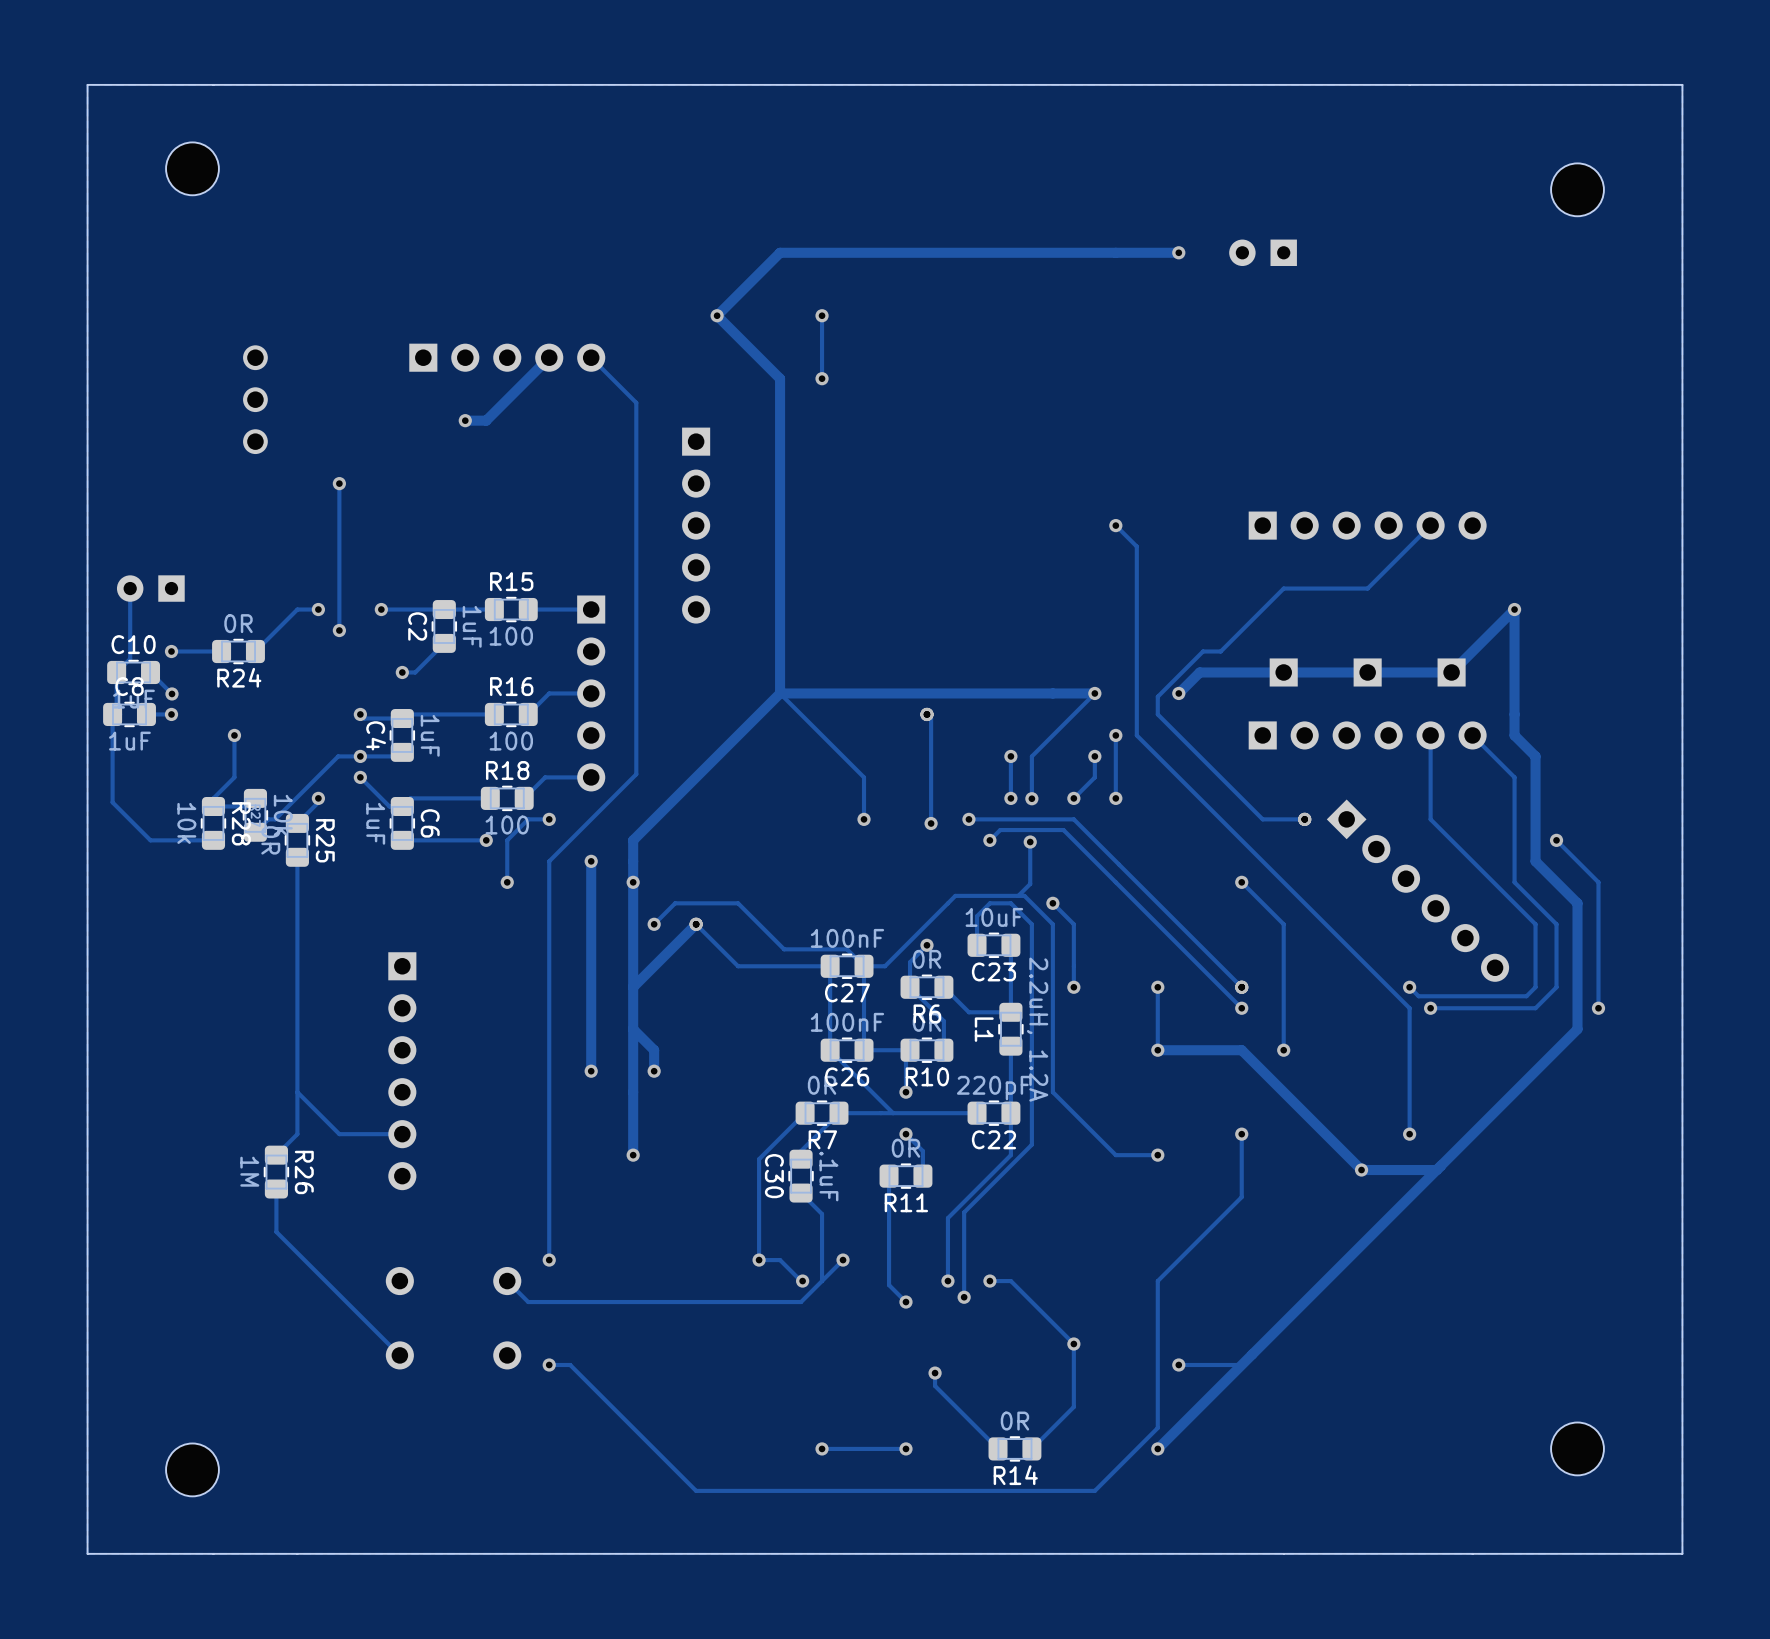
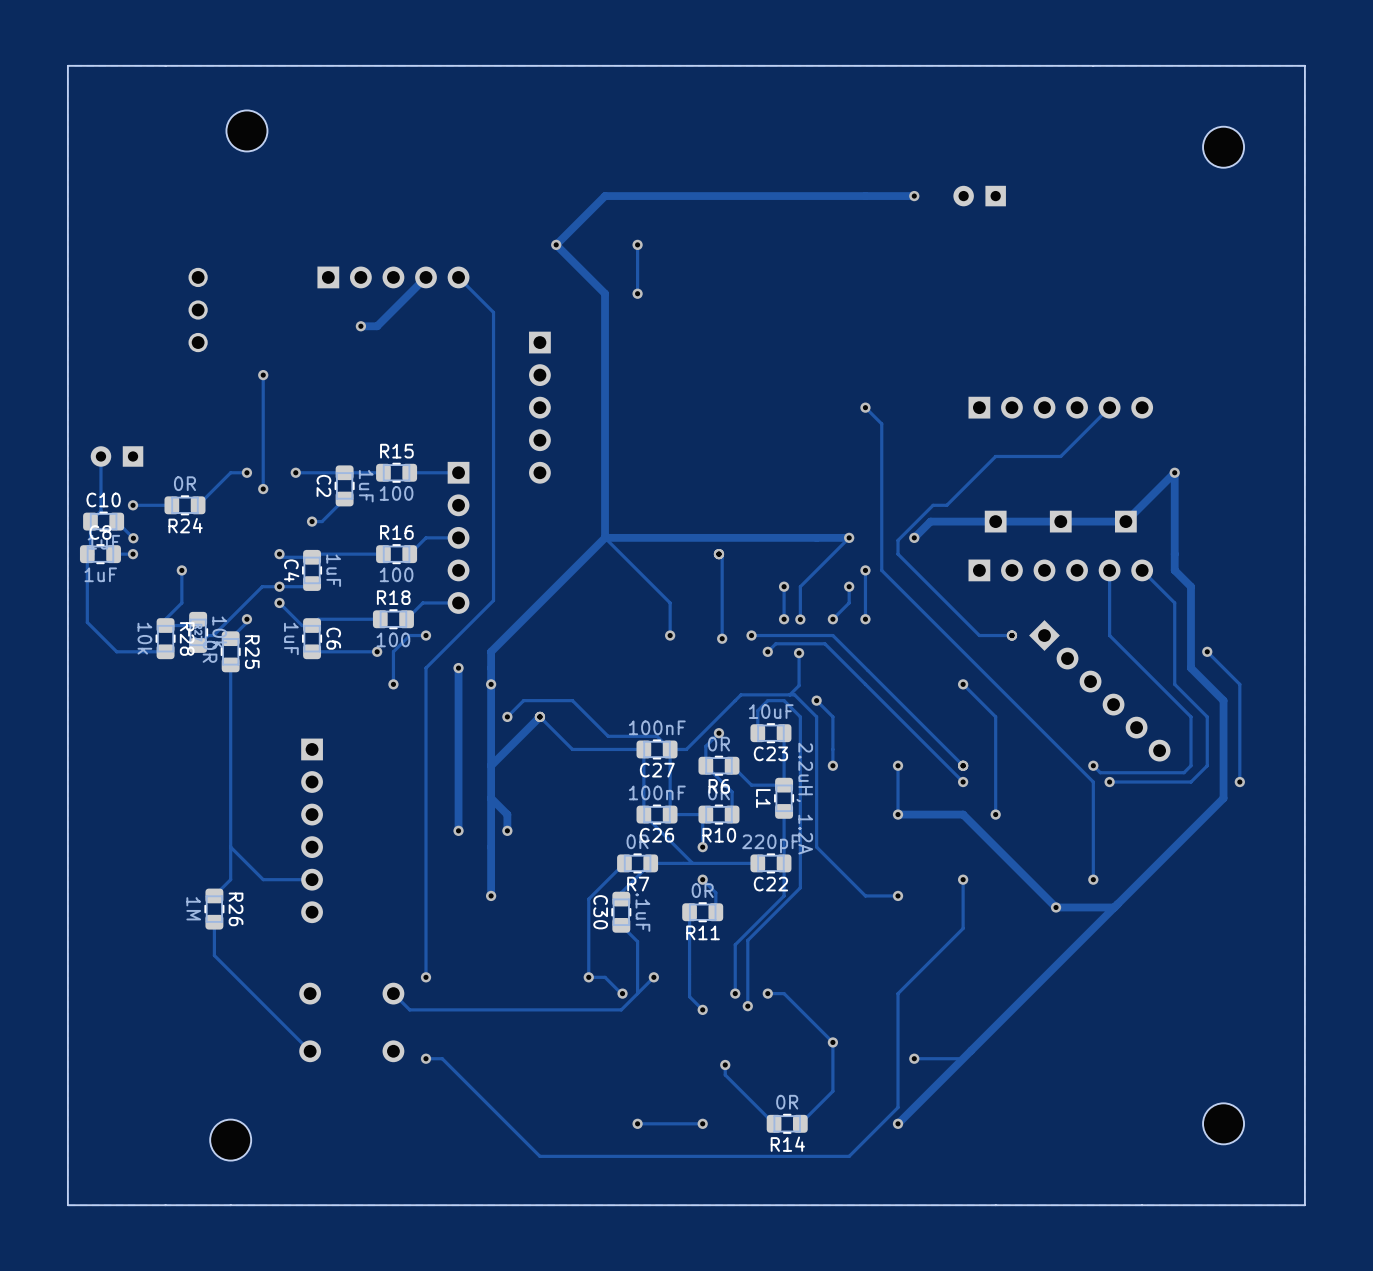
part position: (192, 168) -> (246, 130)
part position: (192, 1469) -> (230, 1140)

